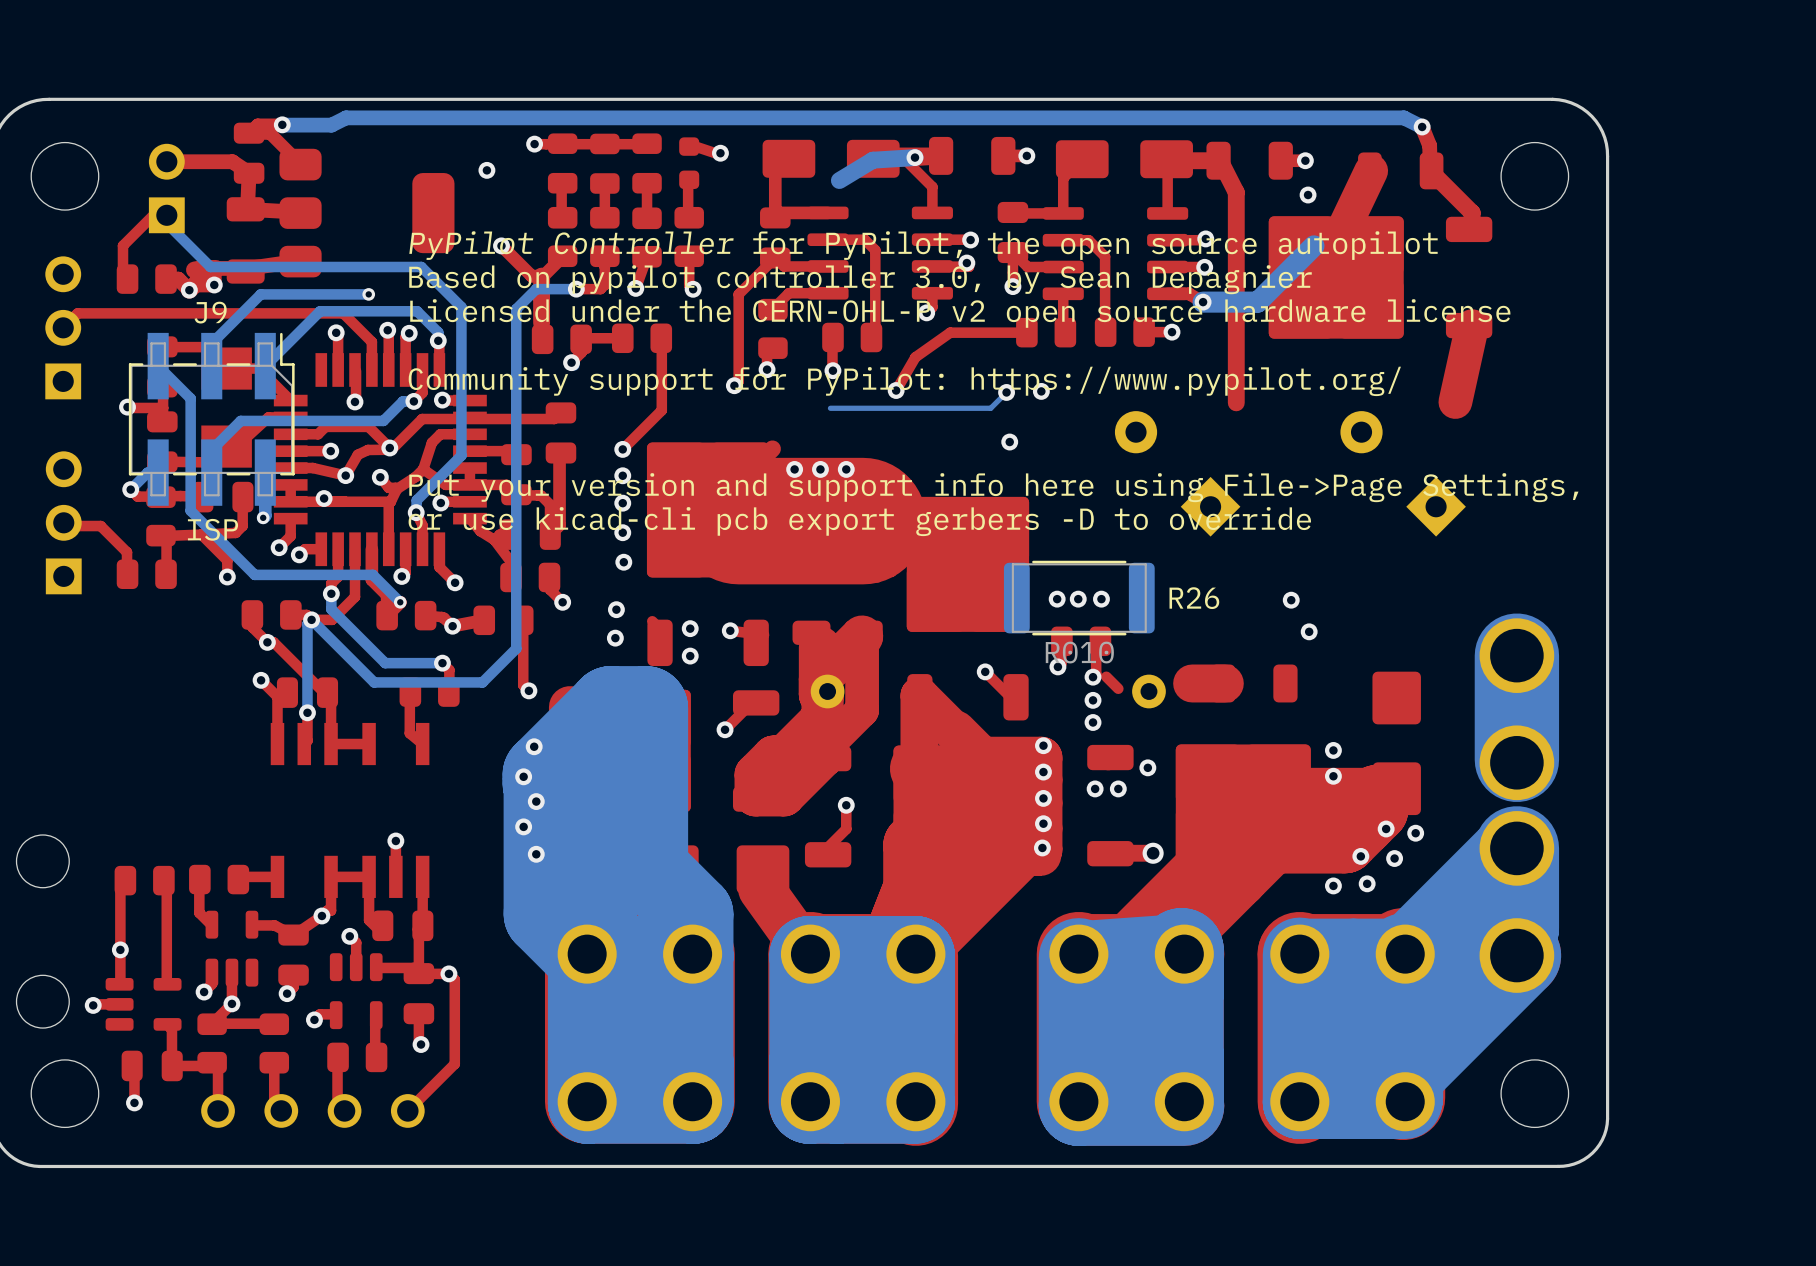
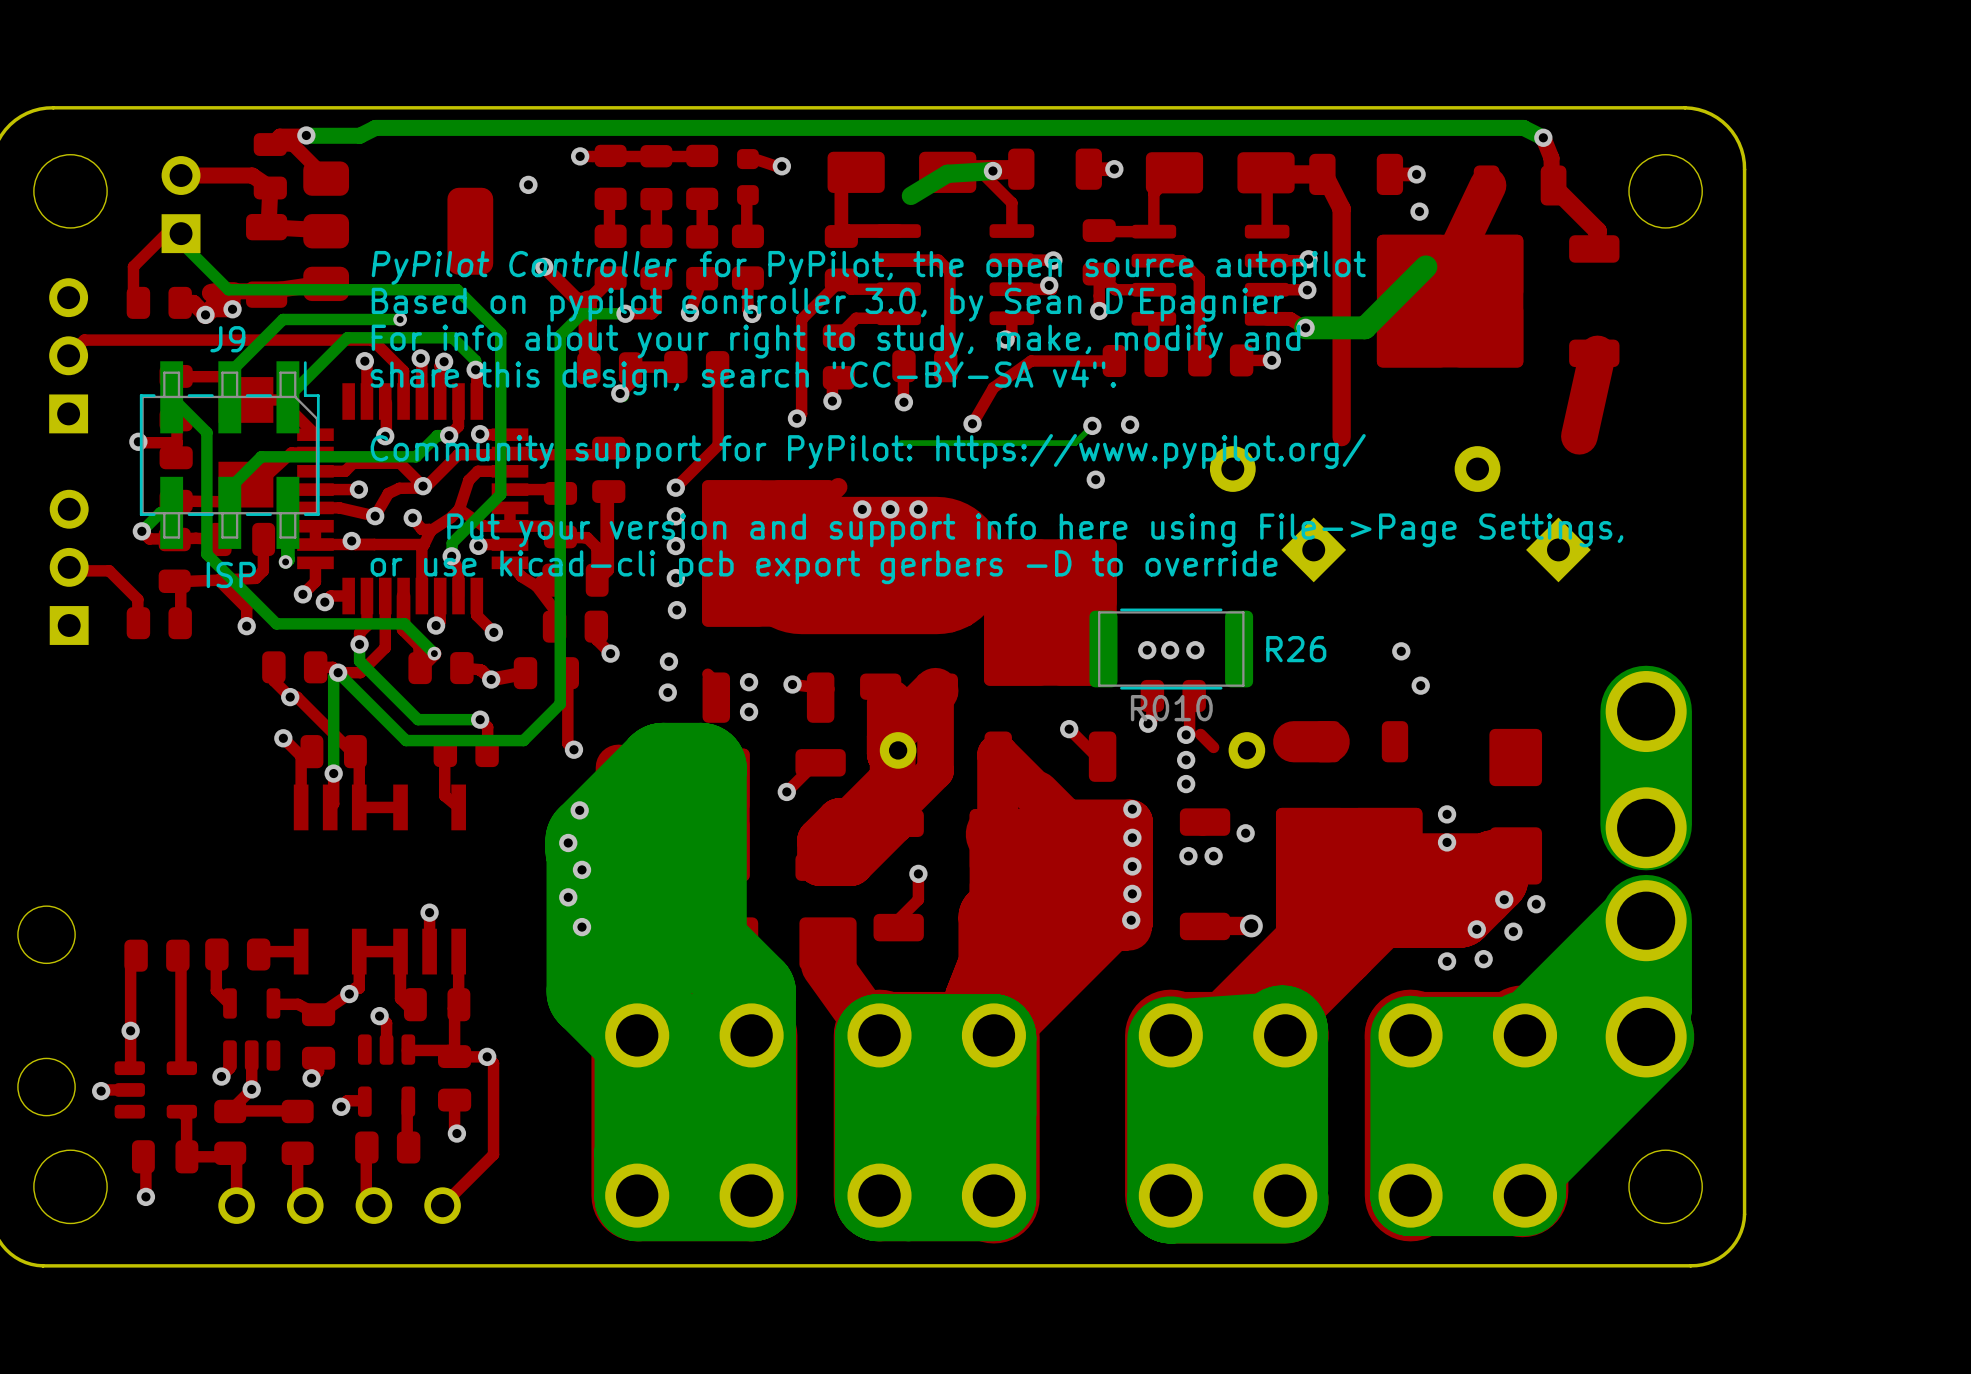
text position: PyPilot Controller (571, 245) -> PyPilot Controller (524, 267)
text position: for PyPilot, the open source autopilot (1095, 245) -> for PyPilot, the open source autopilot (1032, 267)
text: Based on pypilot controller 3.0, by Sean Depagnier (860, 279) -> Based on pypilot controller 3.0, by Sean D'Epagnier (827, 304)
text: none -> For info about your right to study, make, modify and (836, 341)
text: Licensed under the CERN-OHL-P v2 open source hardware license (960, 313) -> none
text: none -> share this design, search "CC-BY-SA v4". (743, 377)
text position: Community support for PyPilot: https://www.pypilot.org/ (904, 381) -> Community support for PyPilot: https://www.pypilot.org/ (868, 451)
text position: or use kicad-cli pcb export gerbers -D to override (859, 521) -> or use kicad-cli pcb export gerbers -D to override (824, 567)

